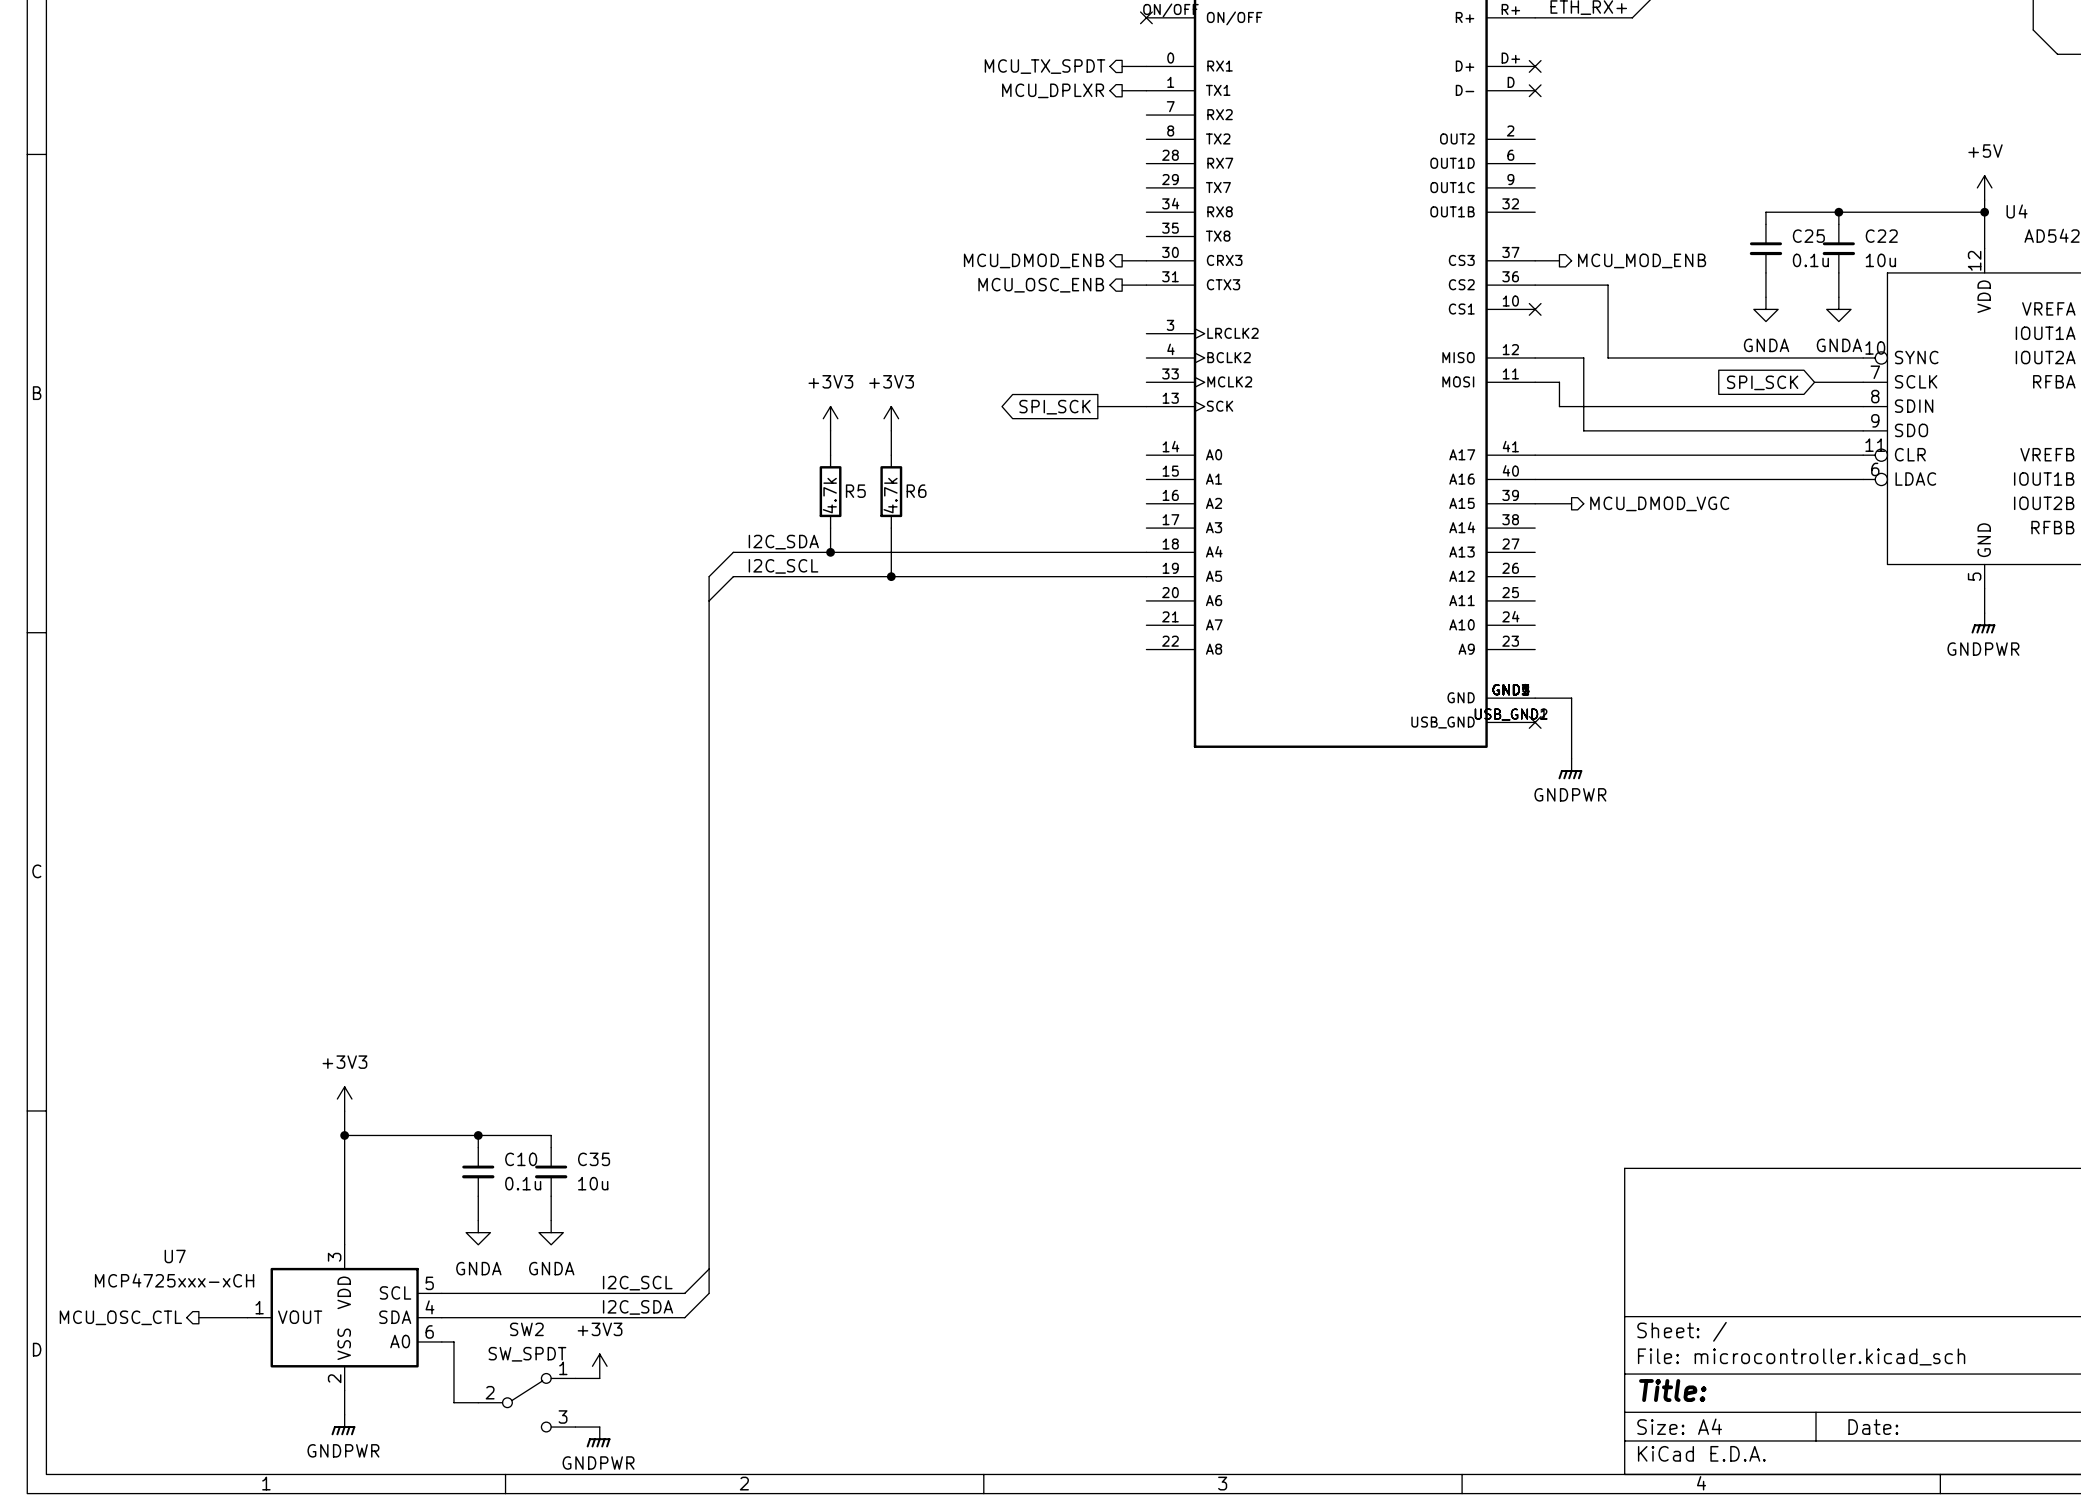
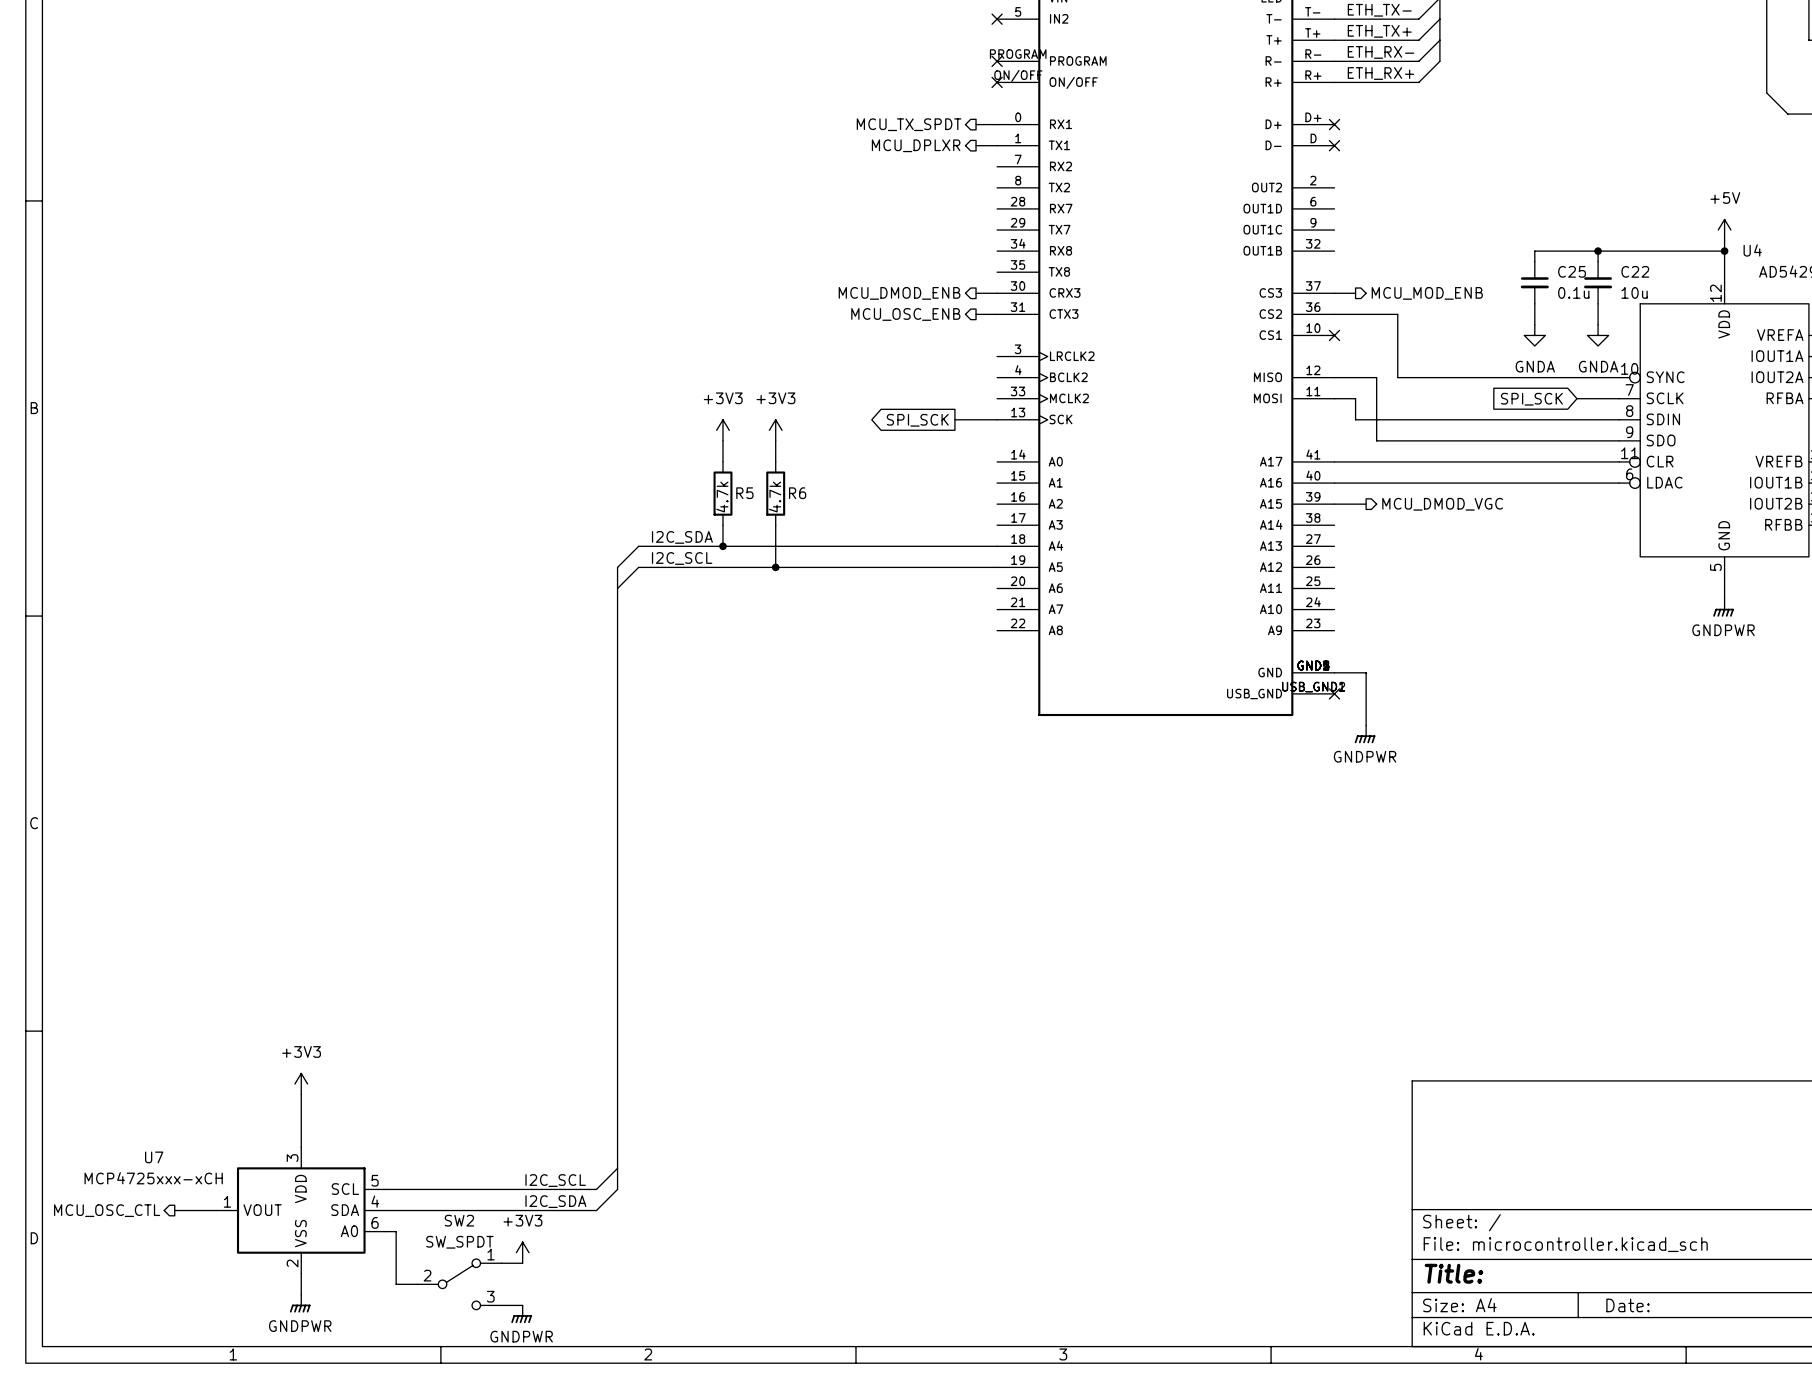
power symbol position: +3V3 (344, 1099) -> +3V3 (301, 1084)
wire: (344, 1111) (344, 1184) -> none
wire: (344, 1135) (551, 1135) (551, 1147) -> none
junction: (344, 1135) -> none
wire: (478, 1135) (478, 1147) -> none
junction: (478, 1135) -> none
C10: 0.1u (478, 1171) -> none
C35: 10u (551, 1171) -> none
wire: (478, 1196) (478, 1220) -> none
wire: (551, 1196) (551, 1220) -> none
power symbol: GNDA (478, 1232) -> none
power symbol: GNDA (551, 1232) -> none

